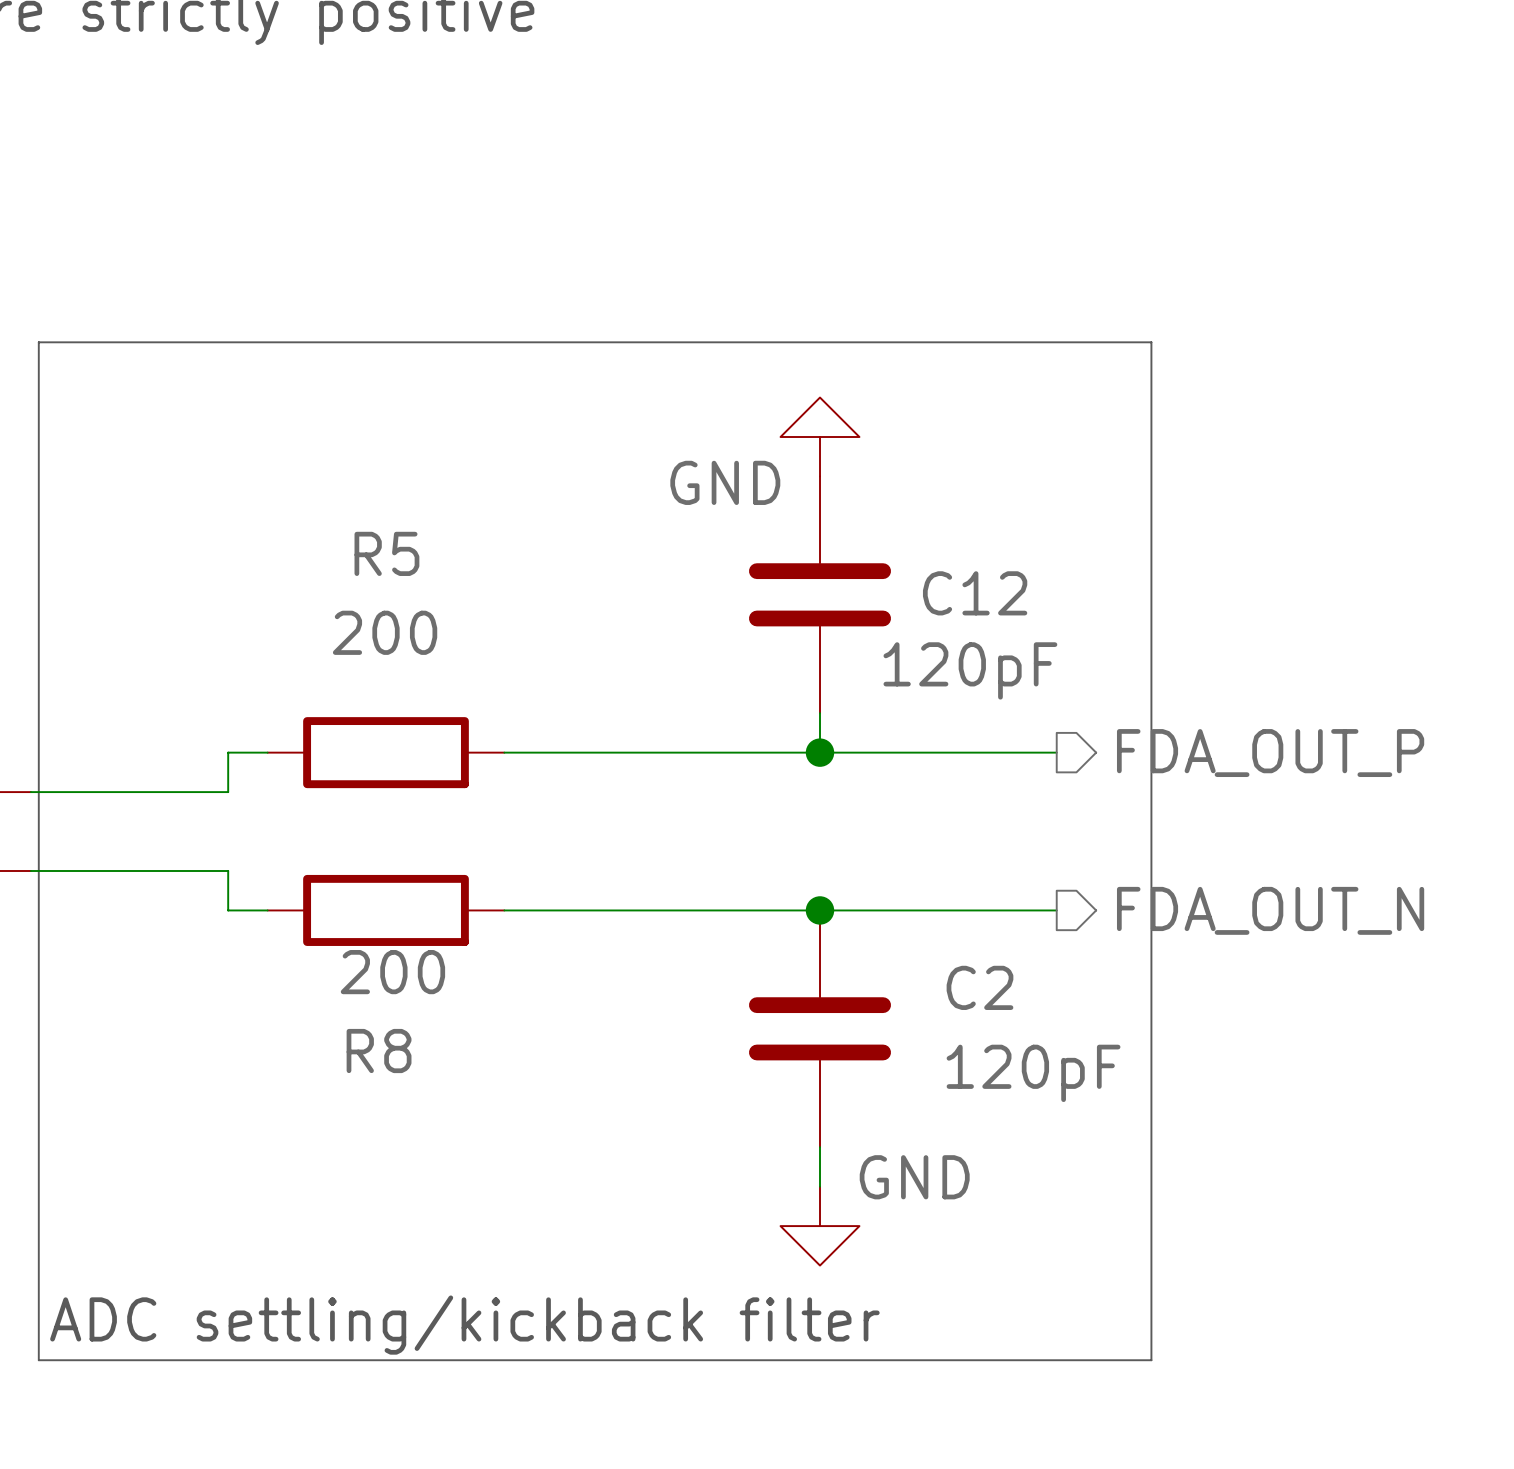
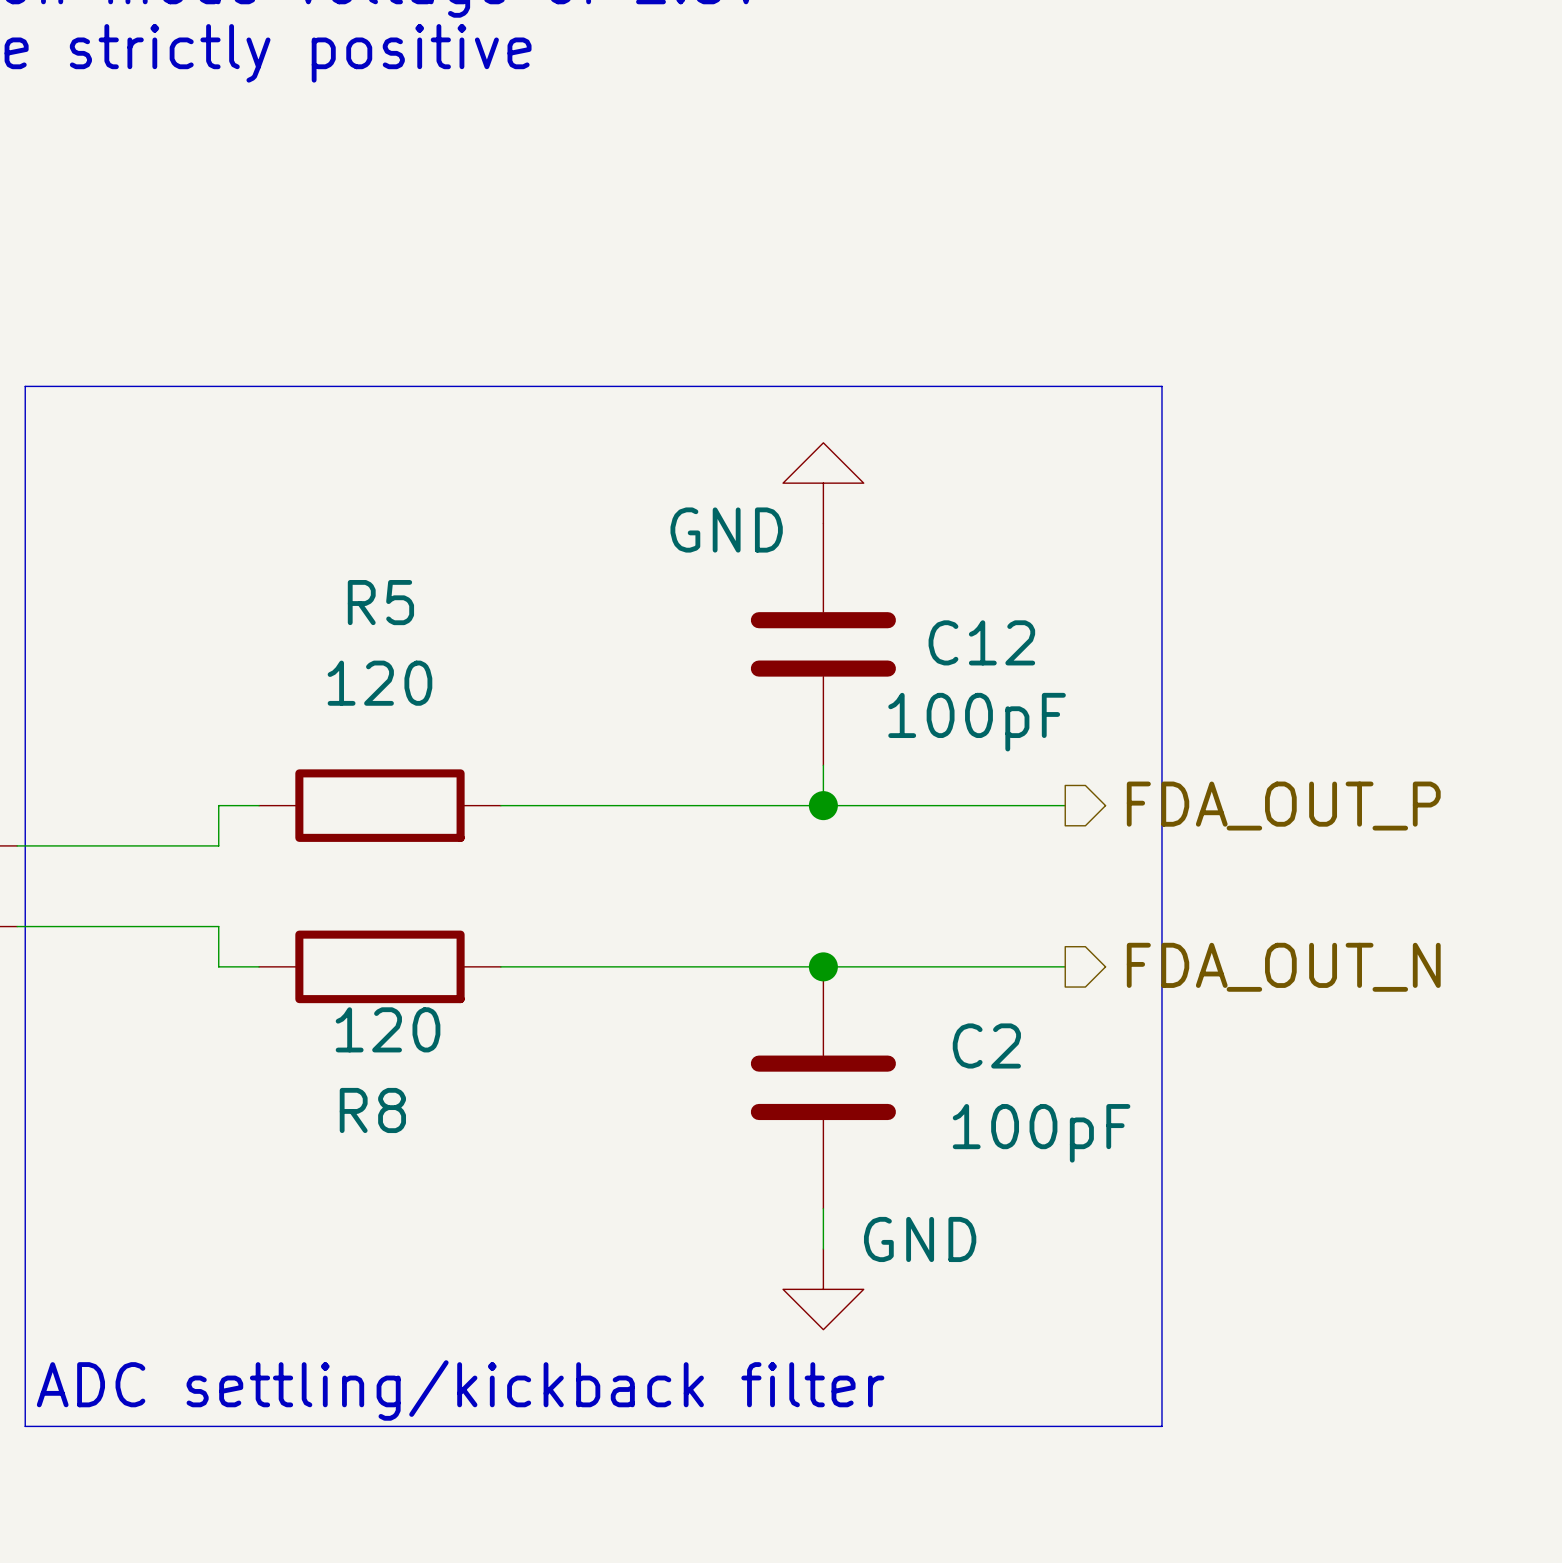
R5 value: 200 (385, 632) -> 120 (379, 683)
C12 value: 120pF (970, 670) -> 100pF (977, 722)
R8 value: 200 (392, 972) -> 120 (388, 1029)
C2 value: 120pF (1033, 1073) -> 100pF (1041, 1133)

